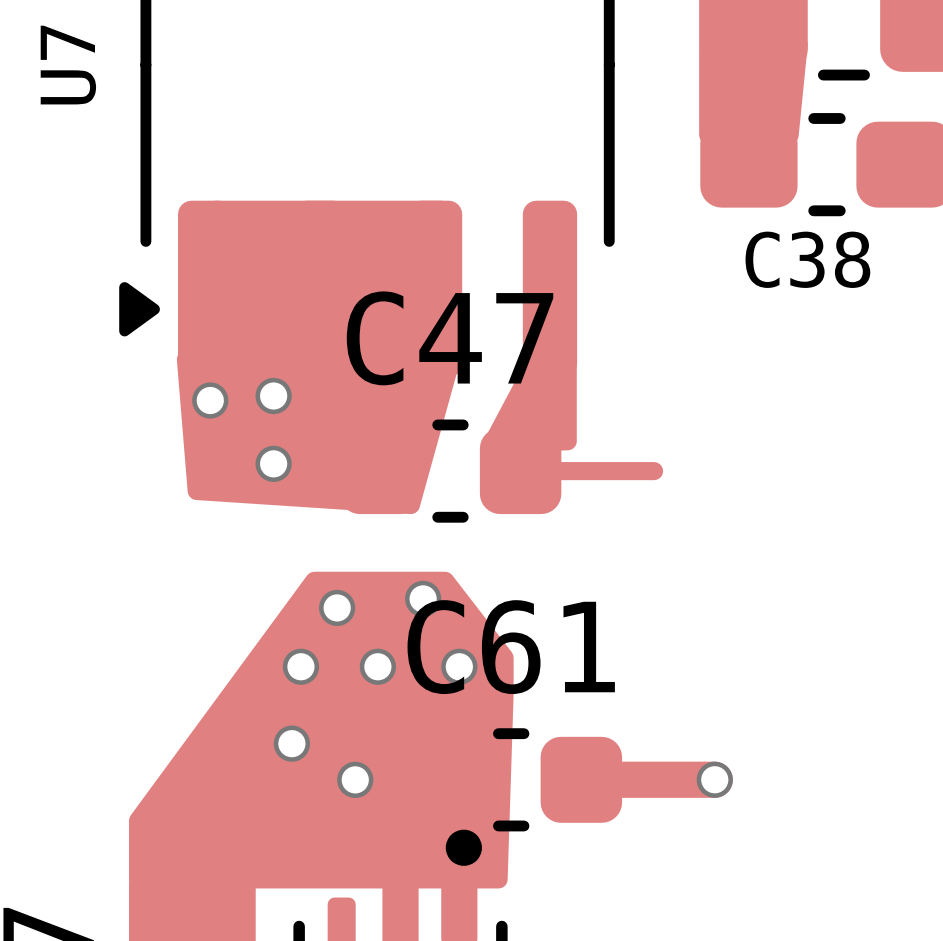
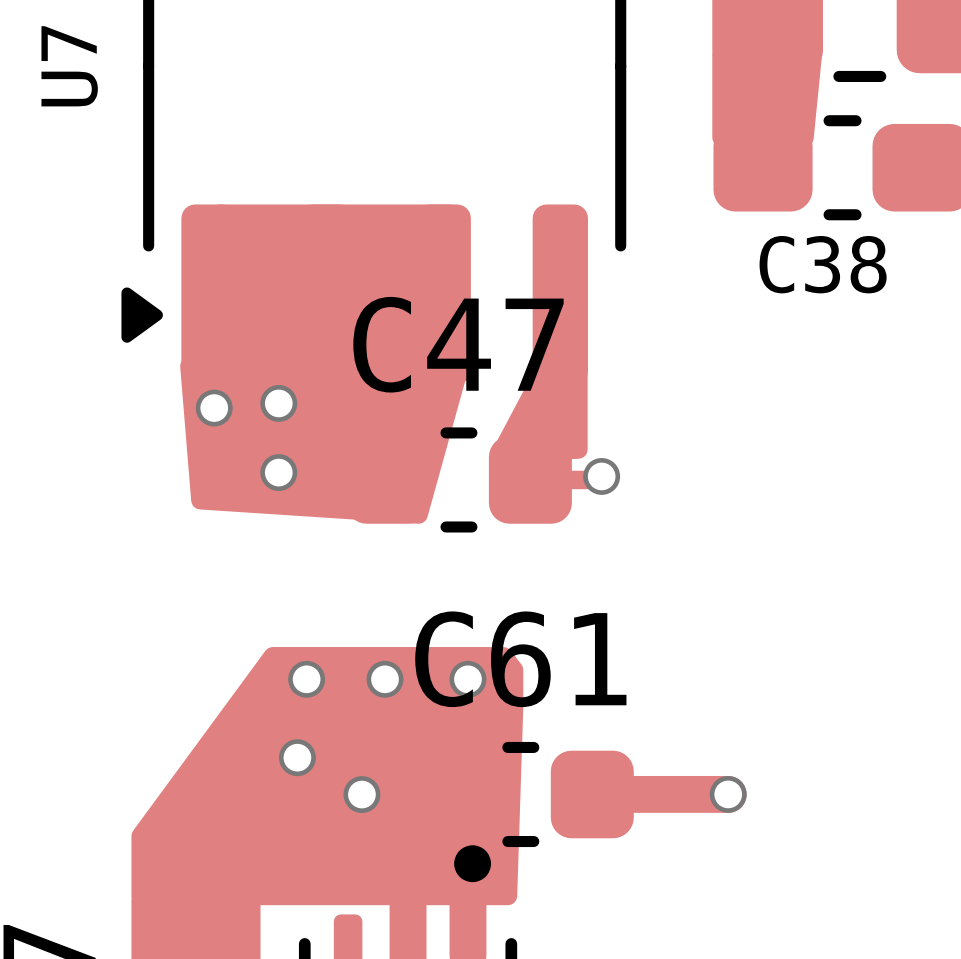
via: none -> (601, 476)
top track: (581, 471) (654, 471) -> none
drawing shape: [129, 571, 514, 889] -> [131, 647, 524, 906]
via: (423, 598) -> none
via: (337, 607) -> none

